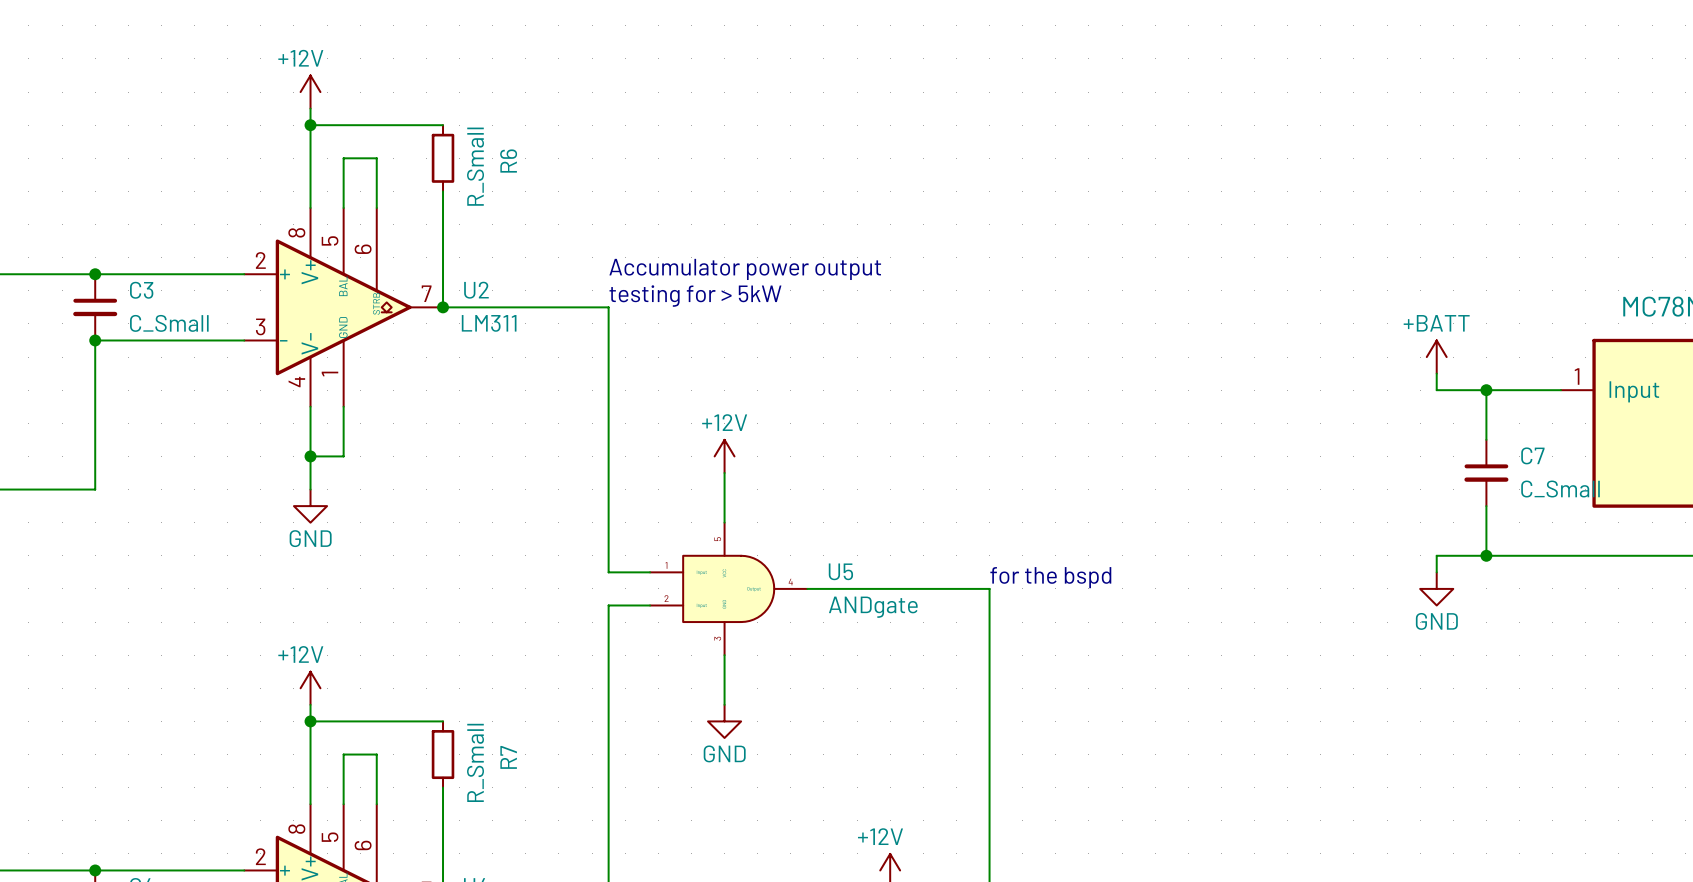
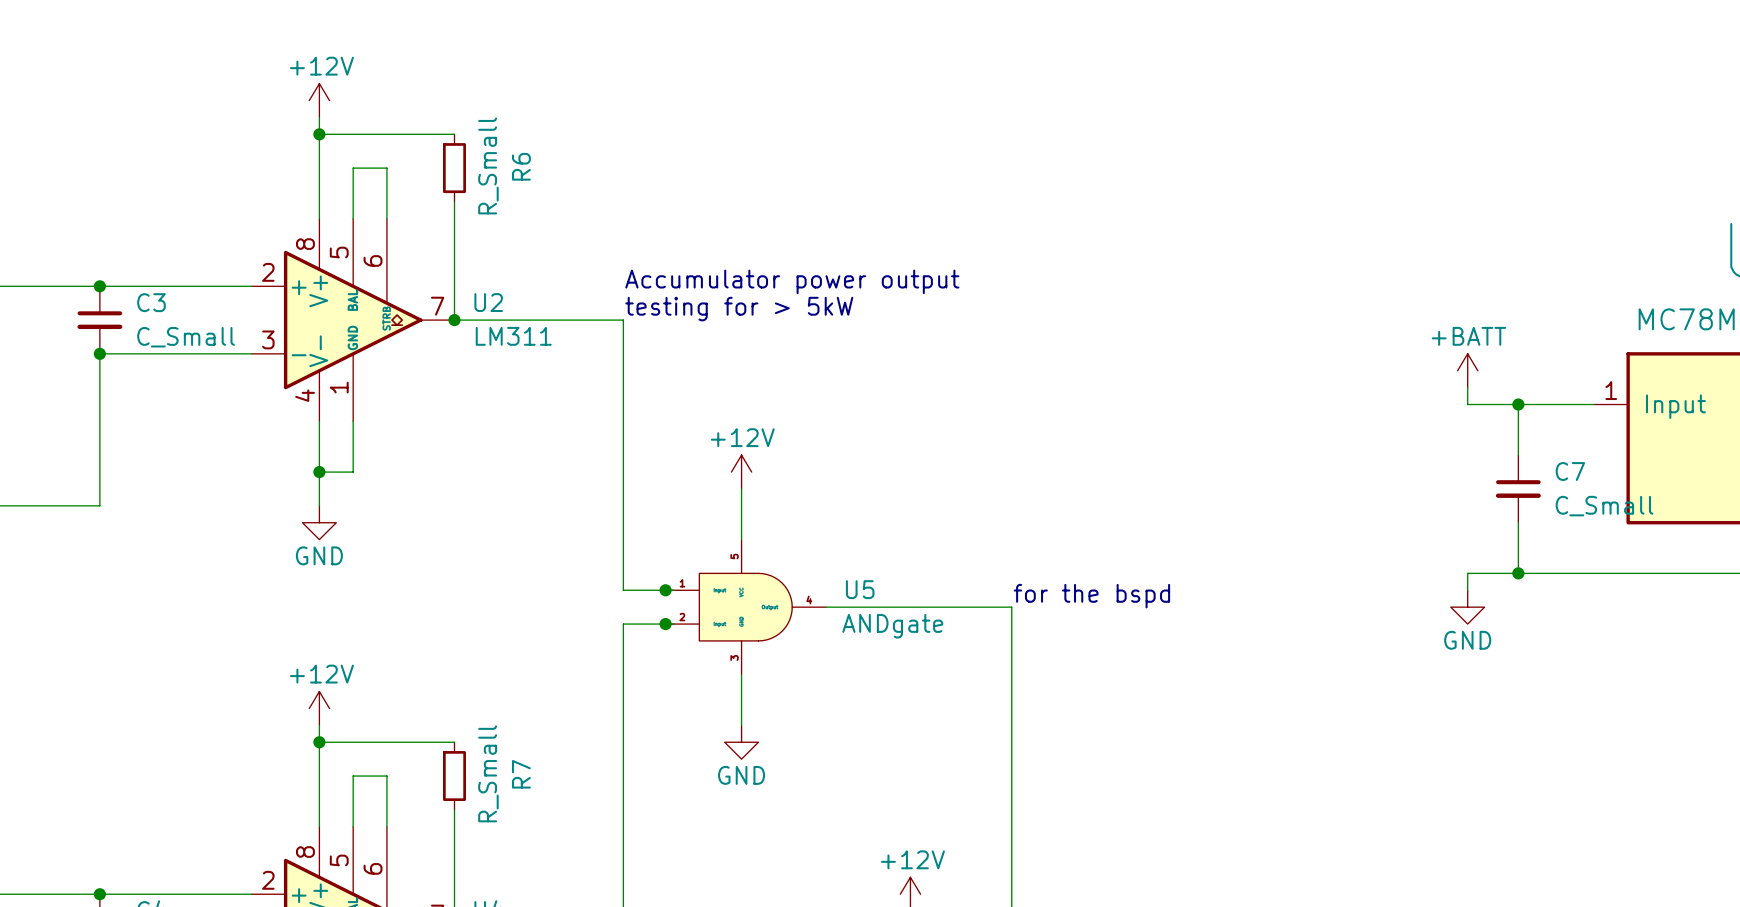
junction: none -> (665, 590)
junction: none -> (665, 624)

